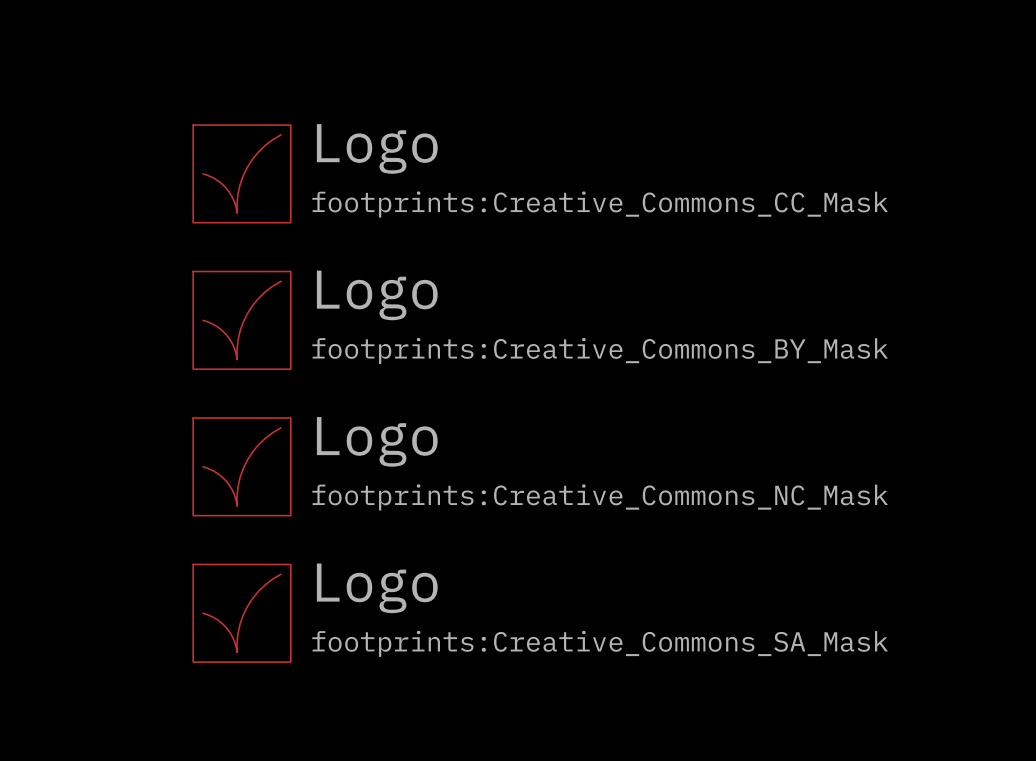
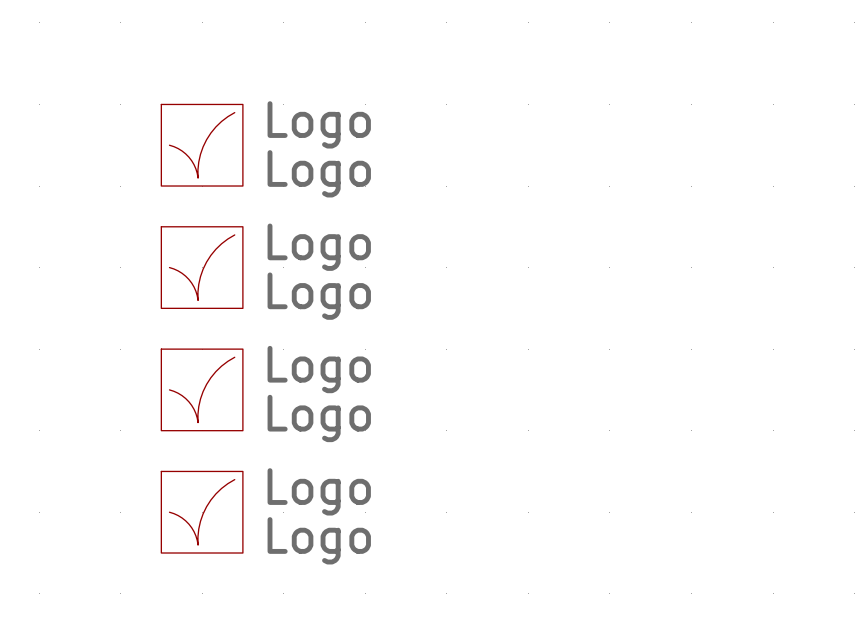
part text: footprints:Creative_Commons_CC_Mask (600, 204) -> Logo (319, 173)
part text: footprints:Creative_Commons_BY_Mask (600, 350) -> Logo (319, 296)
part text: footprints:Creative_Commons_NC_Mask (600, 497) -> Logo (319, 418)
part text: footprints:Creative_Commons_SA_Mask (600, 643) -> Logo (319, 540)

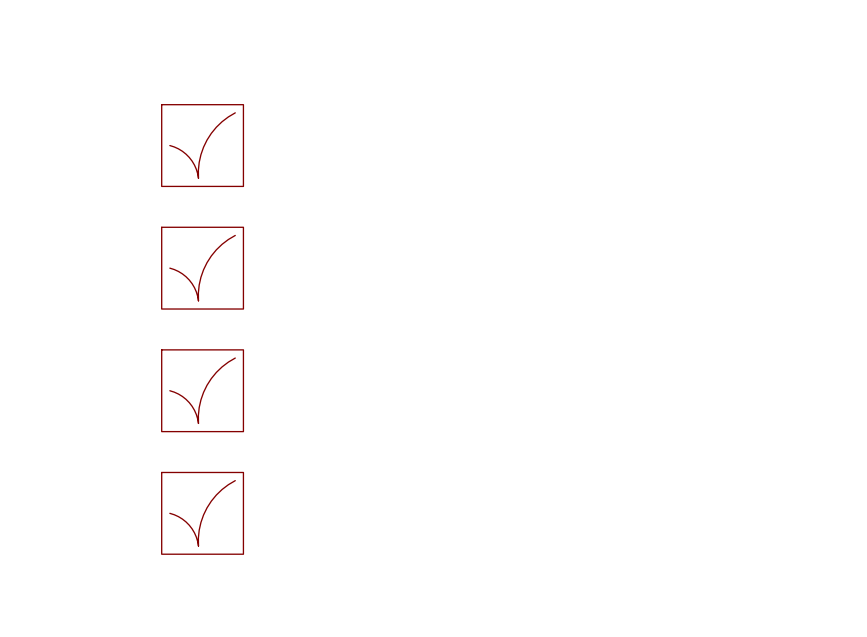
part value: Logo (319, 124) -> none
part text: Logo (319, 173) -> none
part value: Logo (319, 247) -> none
part text: Logo (319, 296) -> none
part value: Logo (319, 369) -> none
part text: Logo (319, 418) -> none
part value: Logo (319, 491) -> none
part text: Logo (319, 540) -> none

